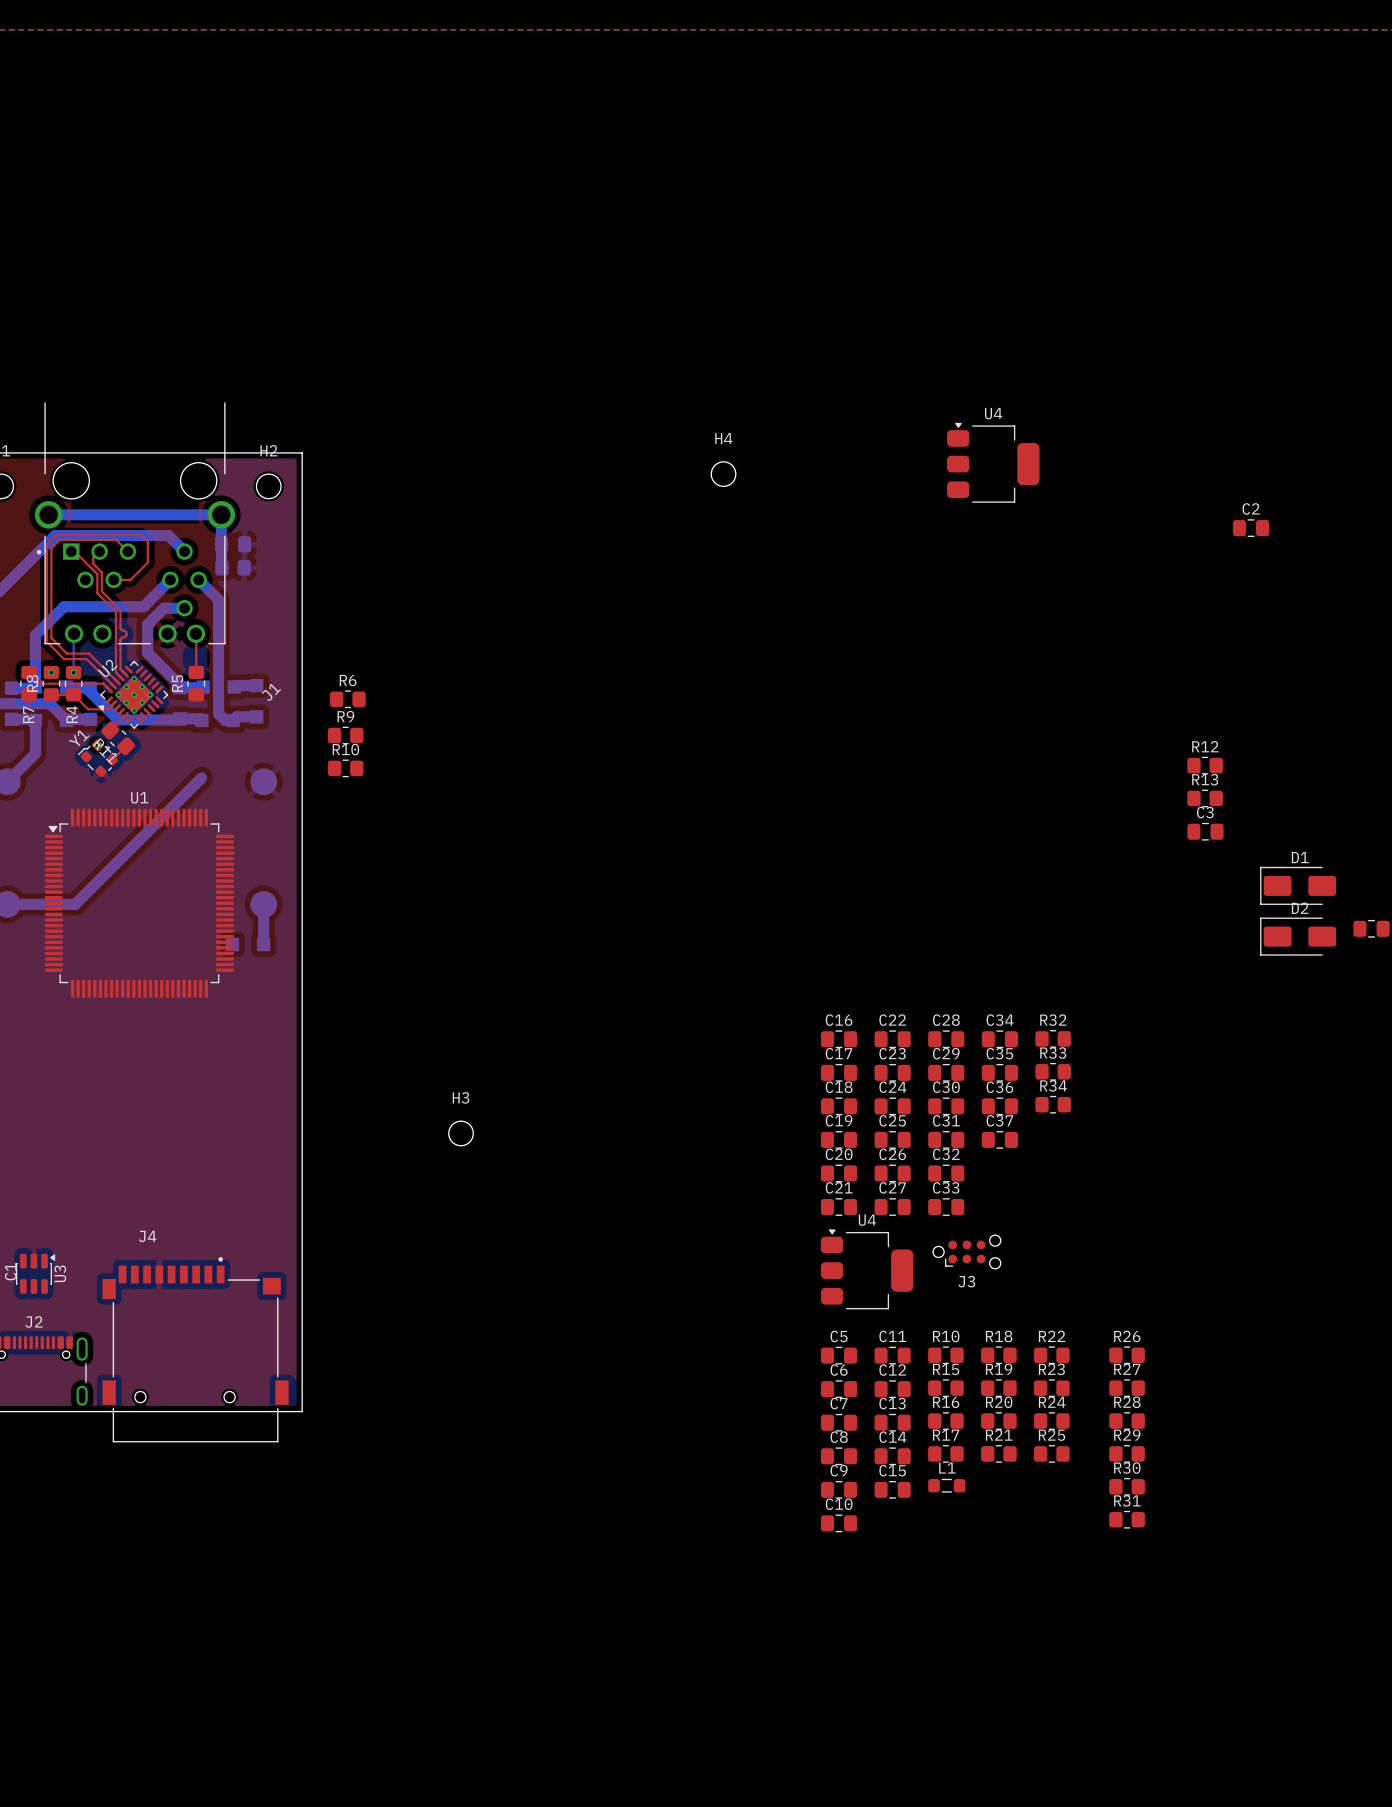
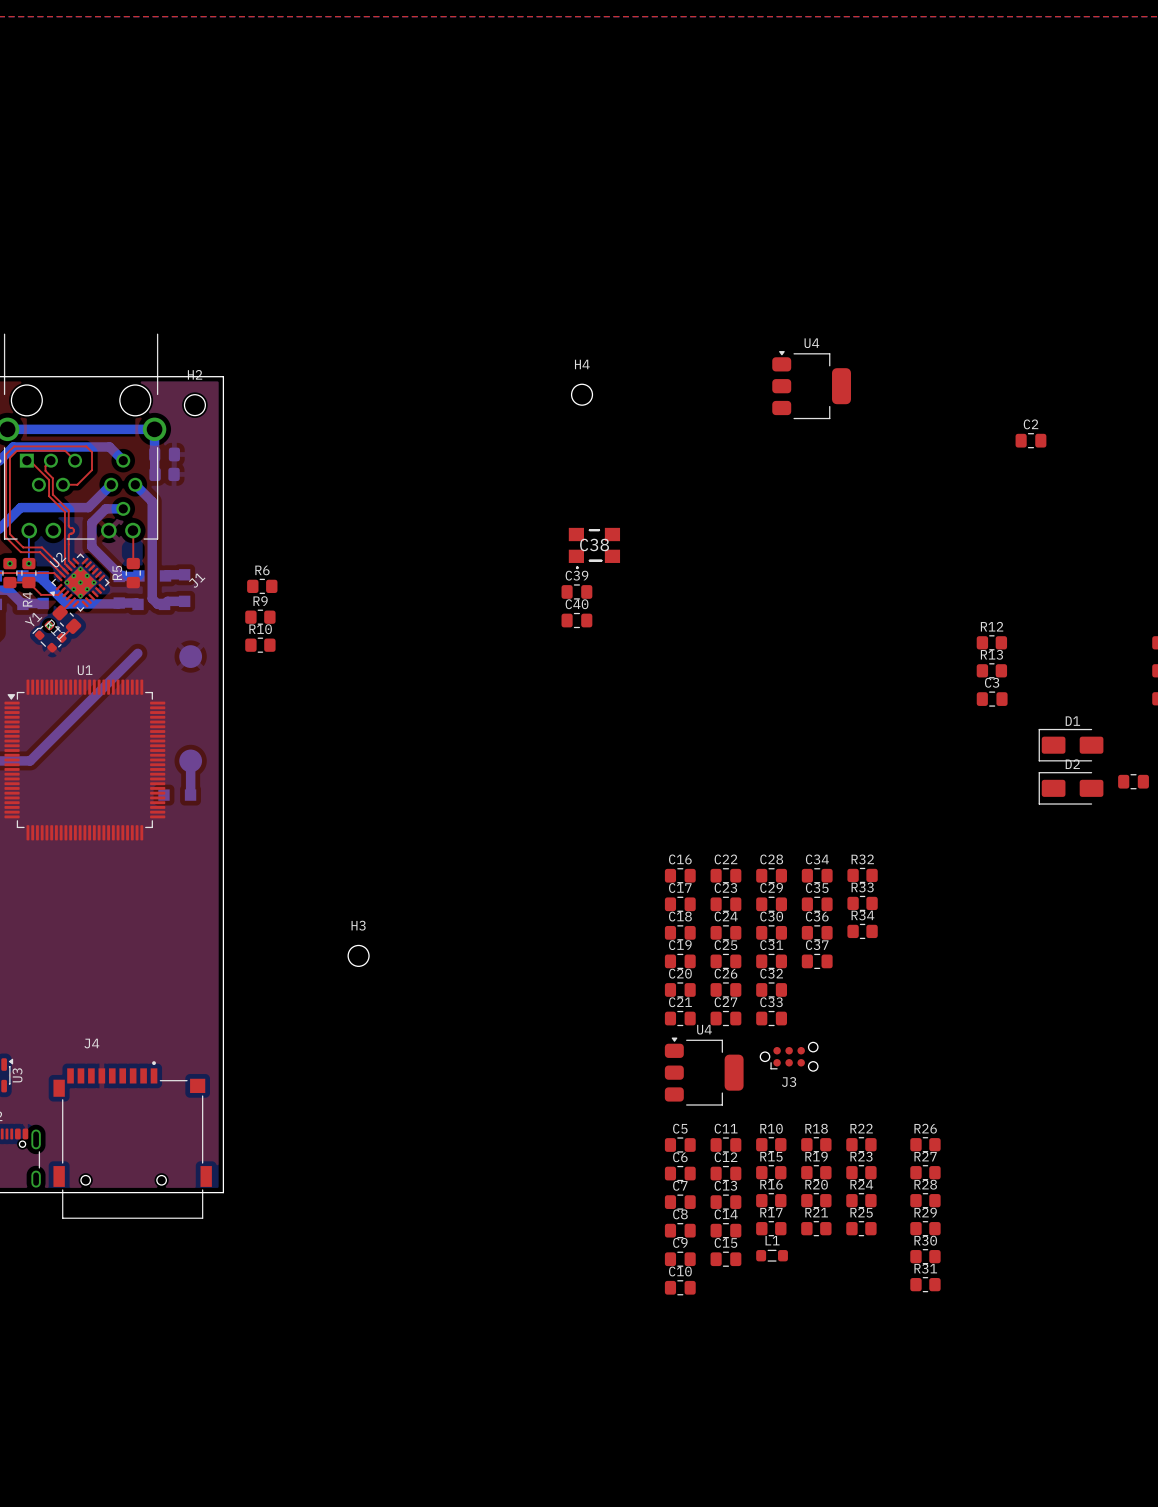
C38: none -> (594, 548)
C39: none -> (576, 591)
C40: none -> (576, 620)

